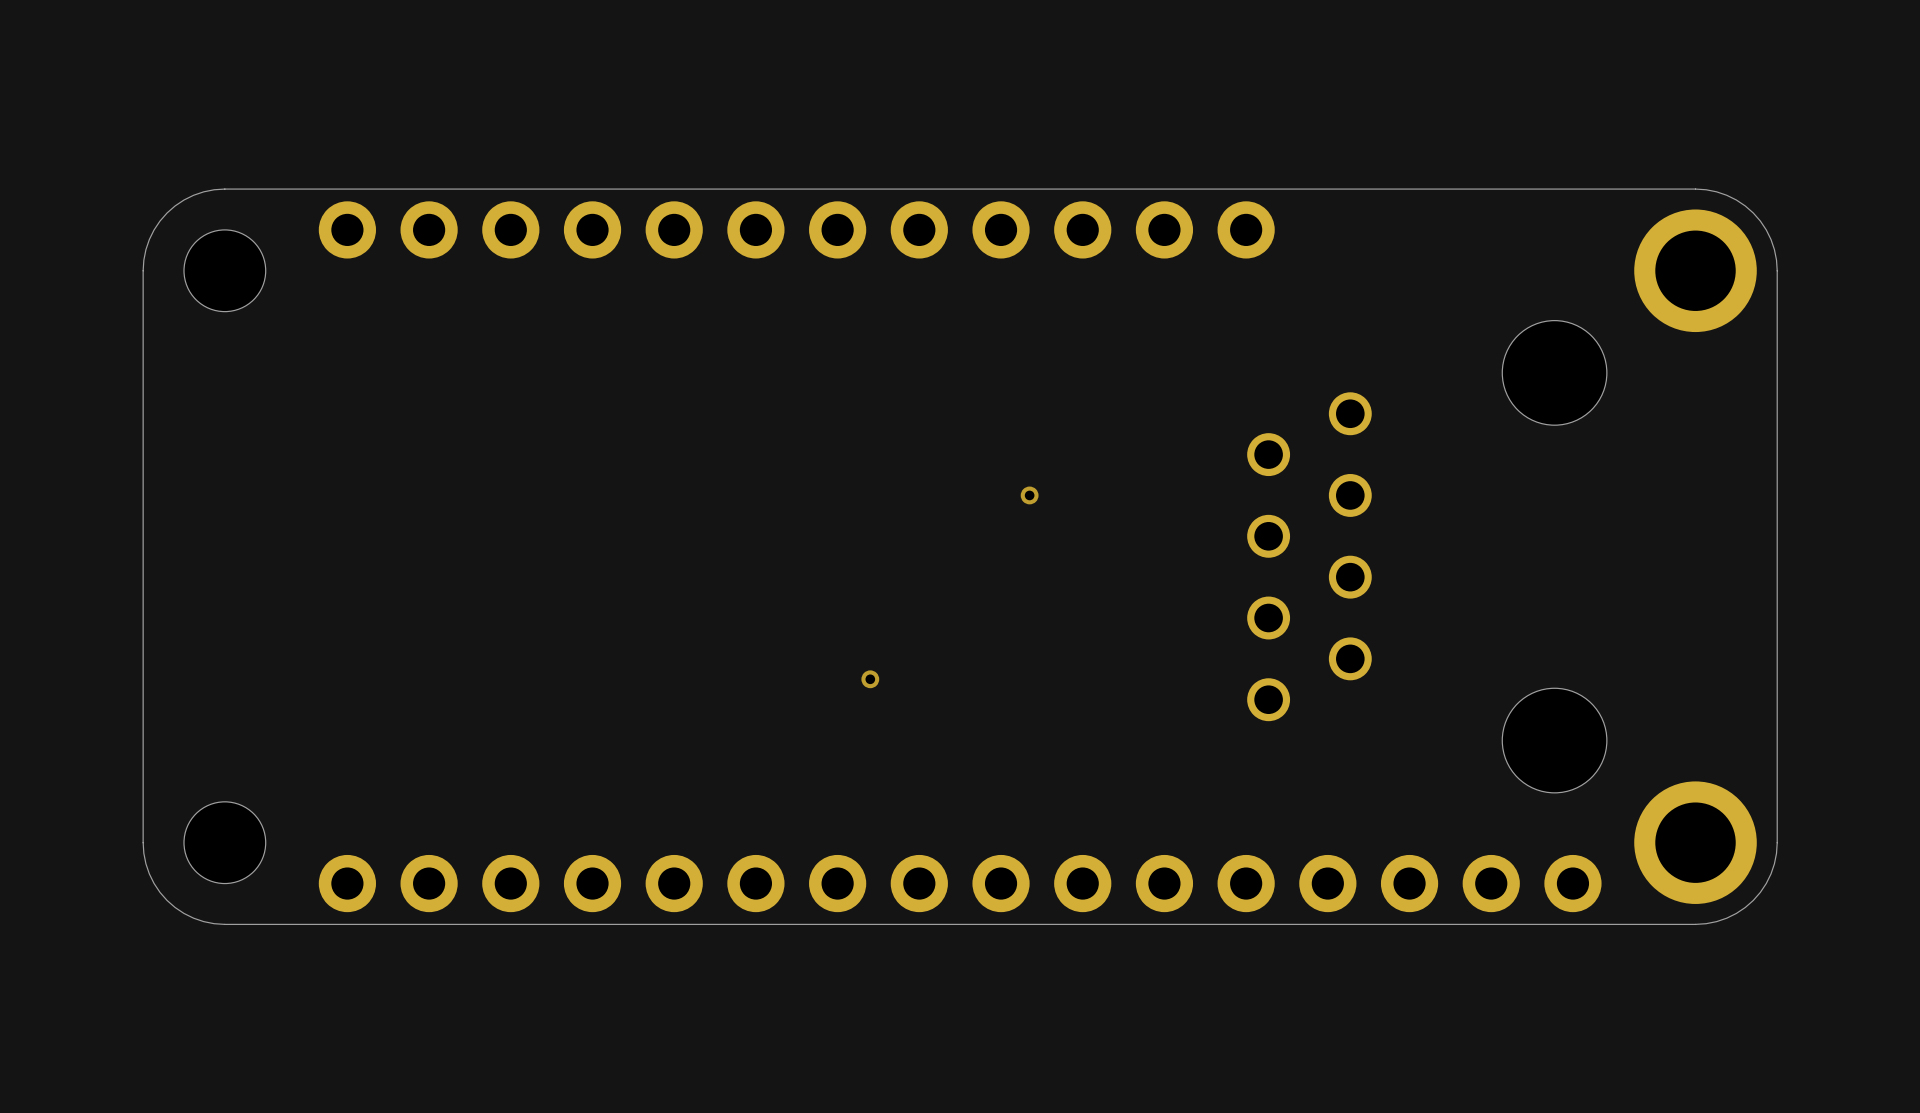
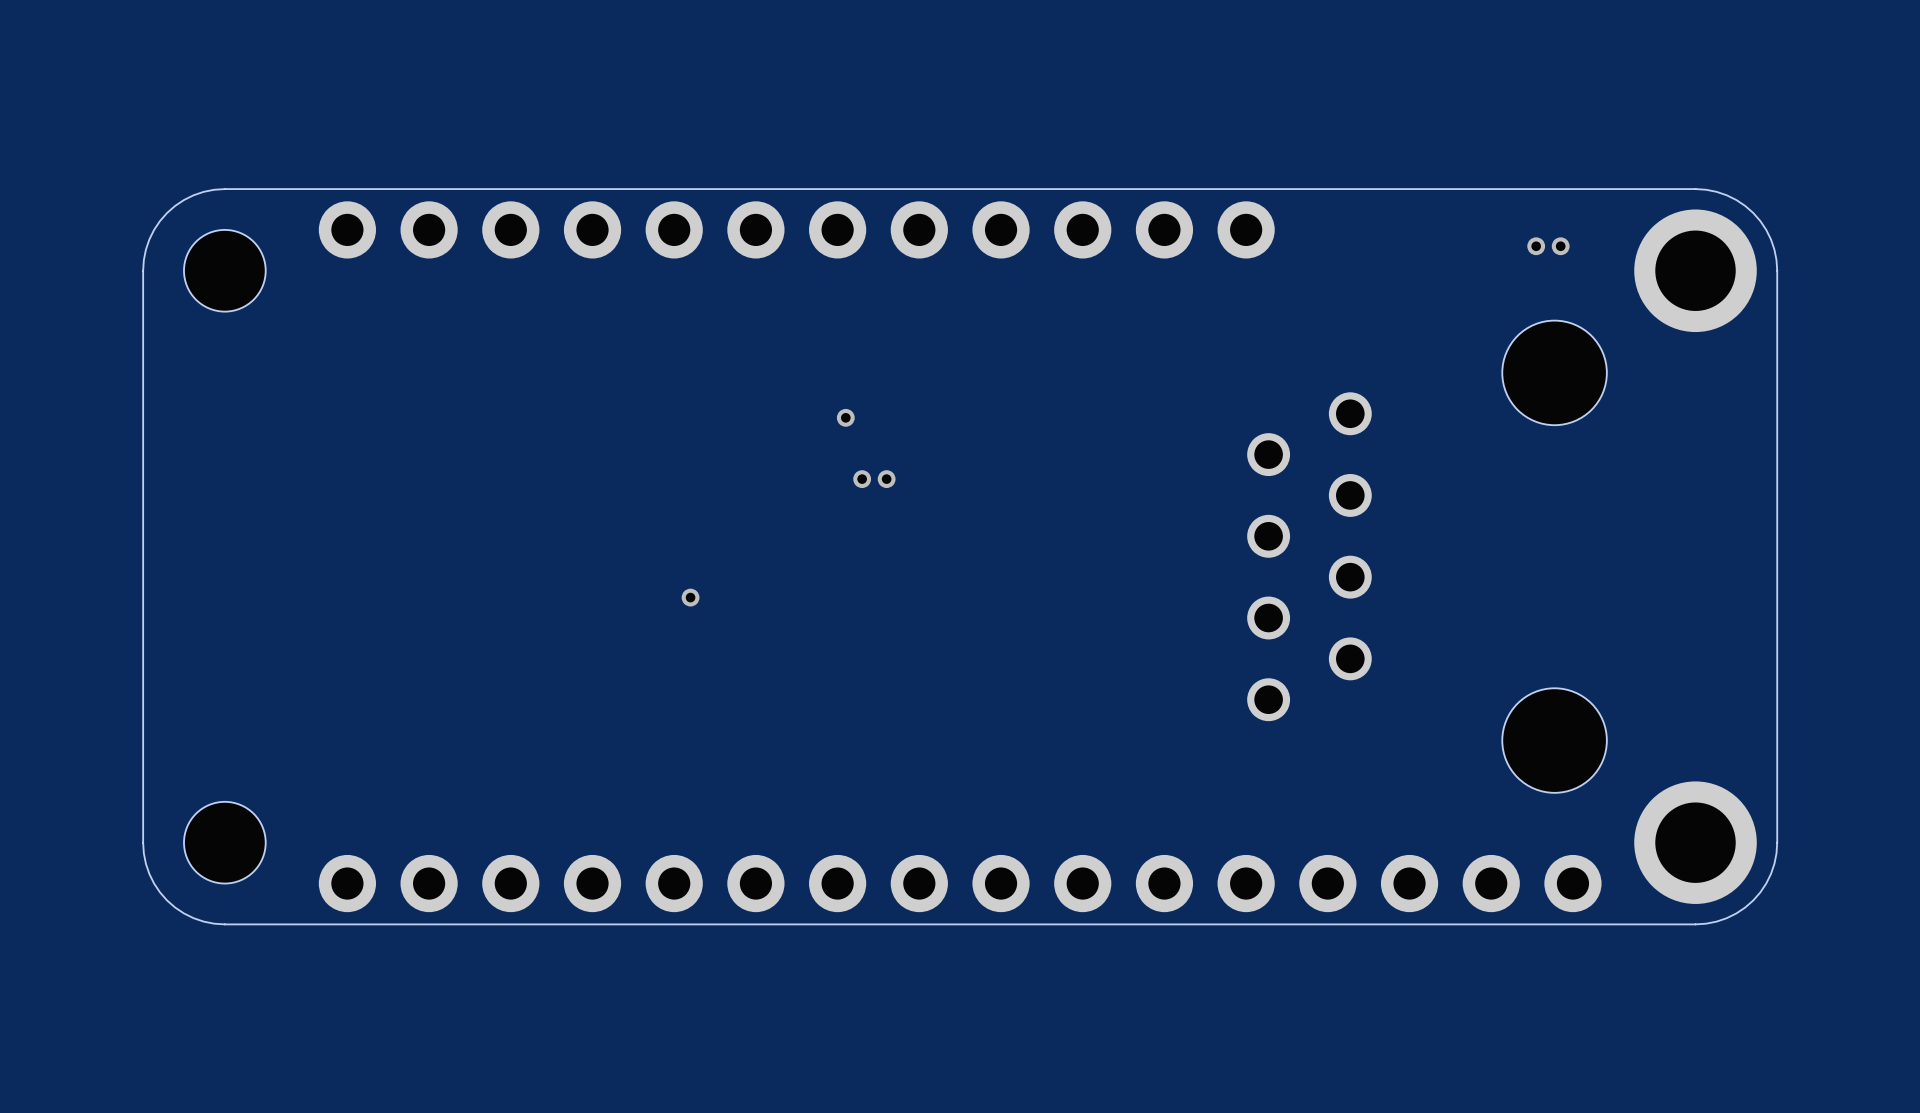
via: none -> (1536, 246)
via: none -> (1560, 246)
via: none -> (845, 417)
via: none -> (862, 479)
via: none -> (886, 479)
via: (1029, 495) -> none
via: none -> (690, 597)
via: (870, 679) -> none

